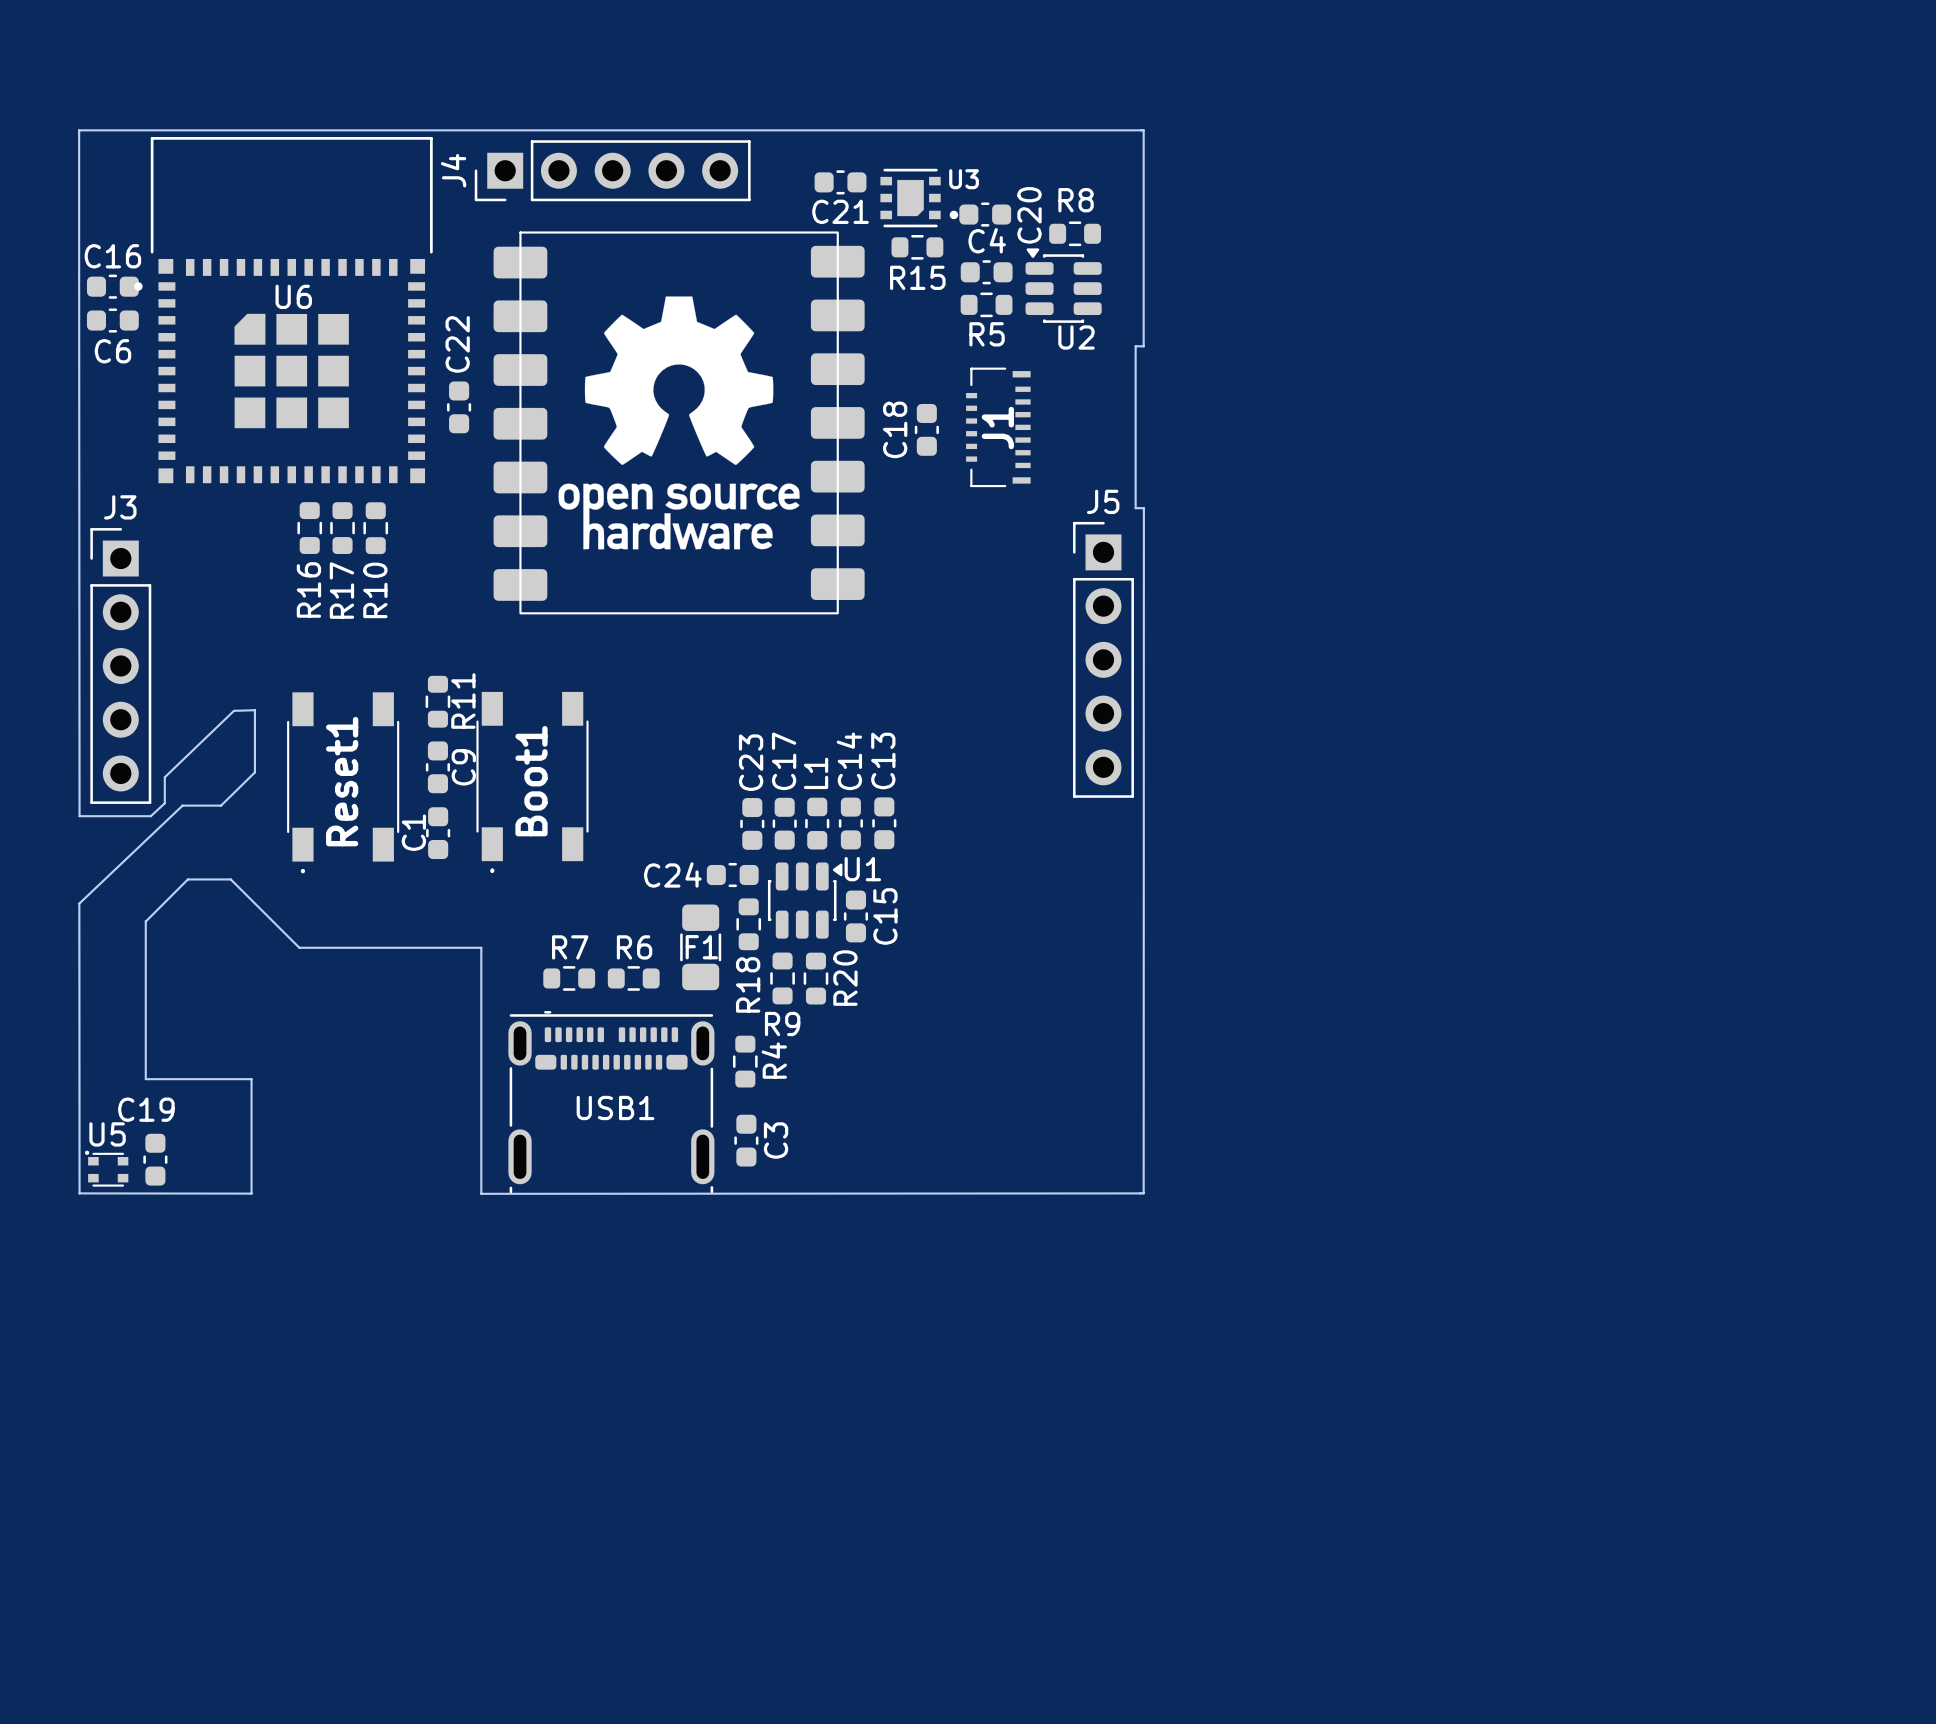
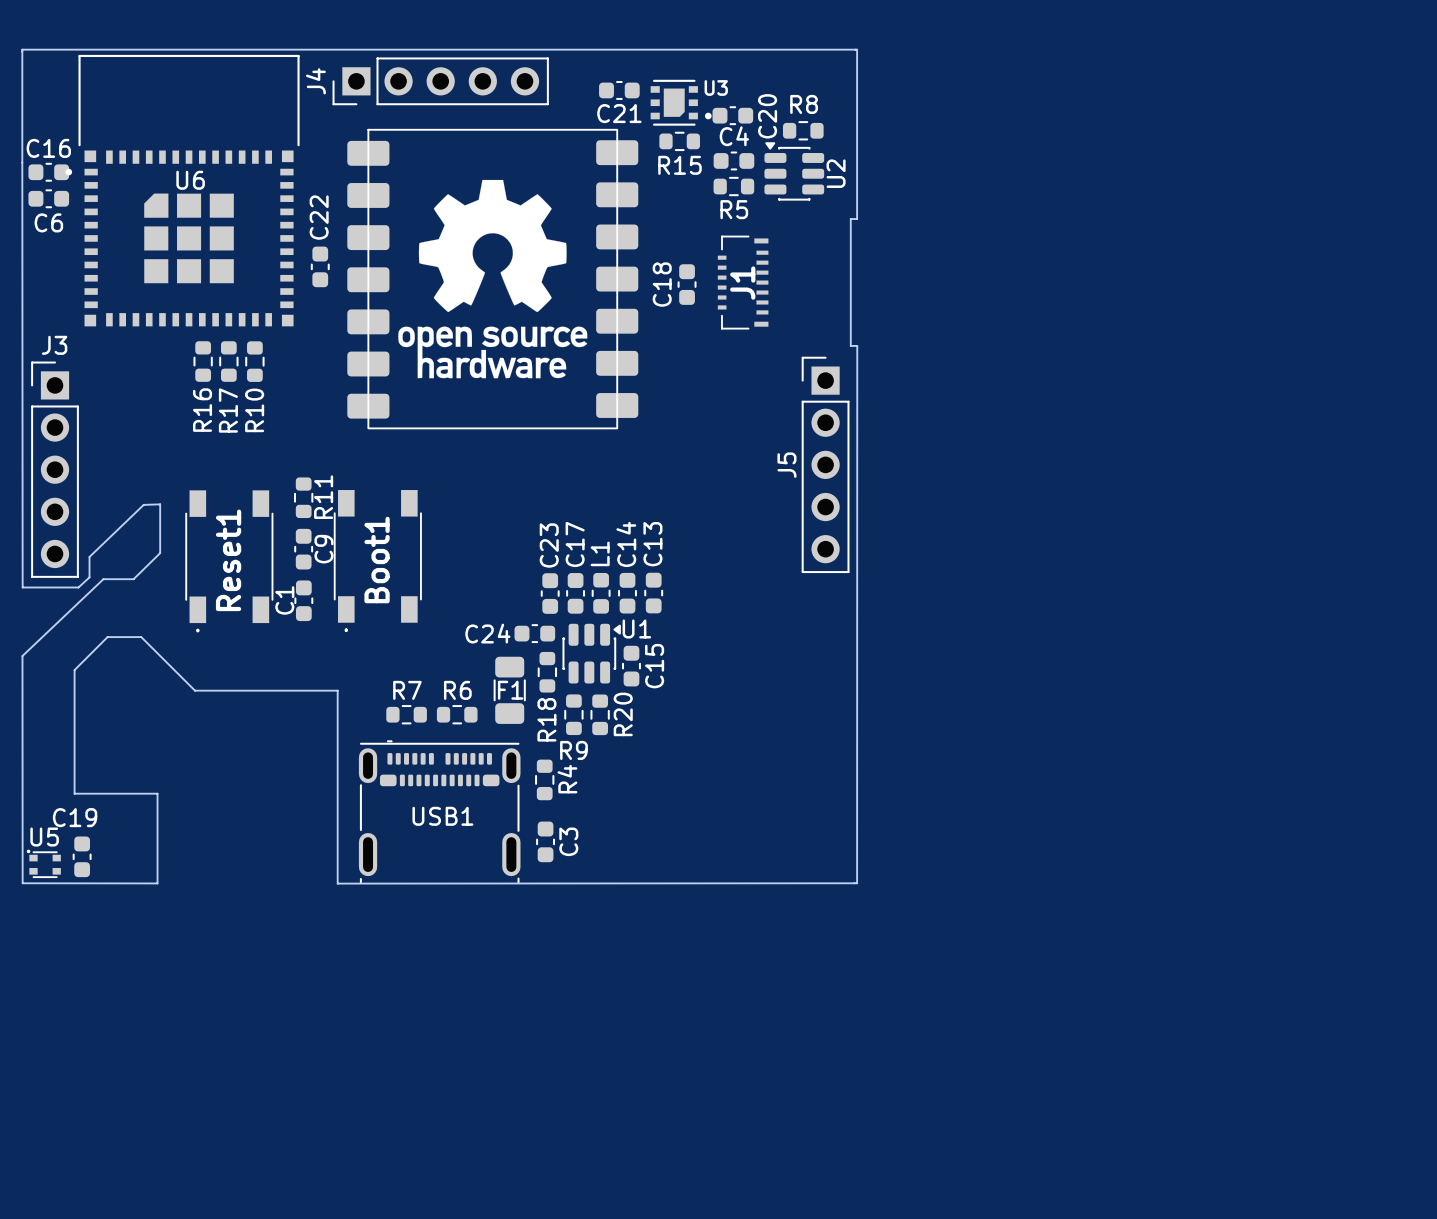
U2 name rotation: 0° (1076, 337) -> 90° counterclockwise (836, 173)
U2 name position: U2 (1076, 337) -> U2 (836, 173)
J5 name rotation: 0° (1103, 501) -> 90° counterclockwise (786, 465)
J5 name position: J5 (1103, 501) -> J5 (786, 465)

